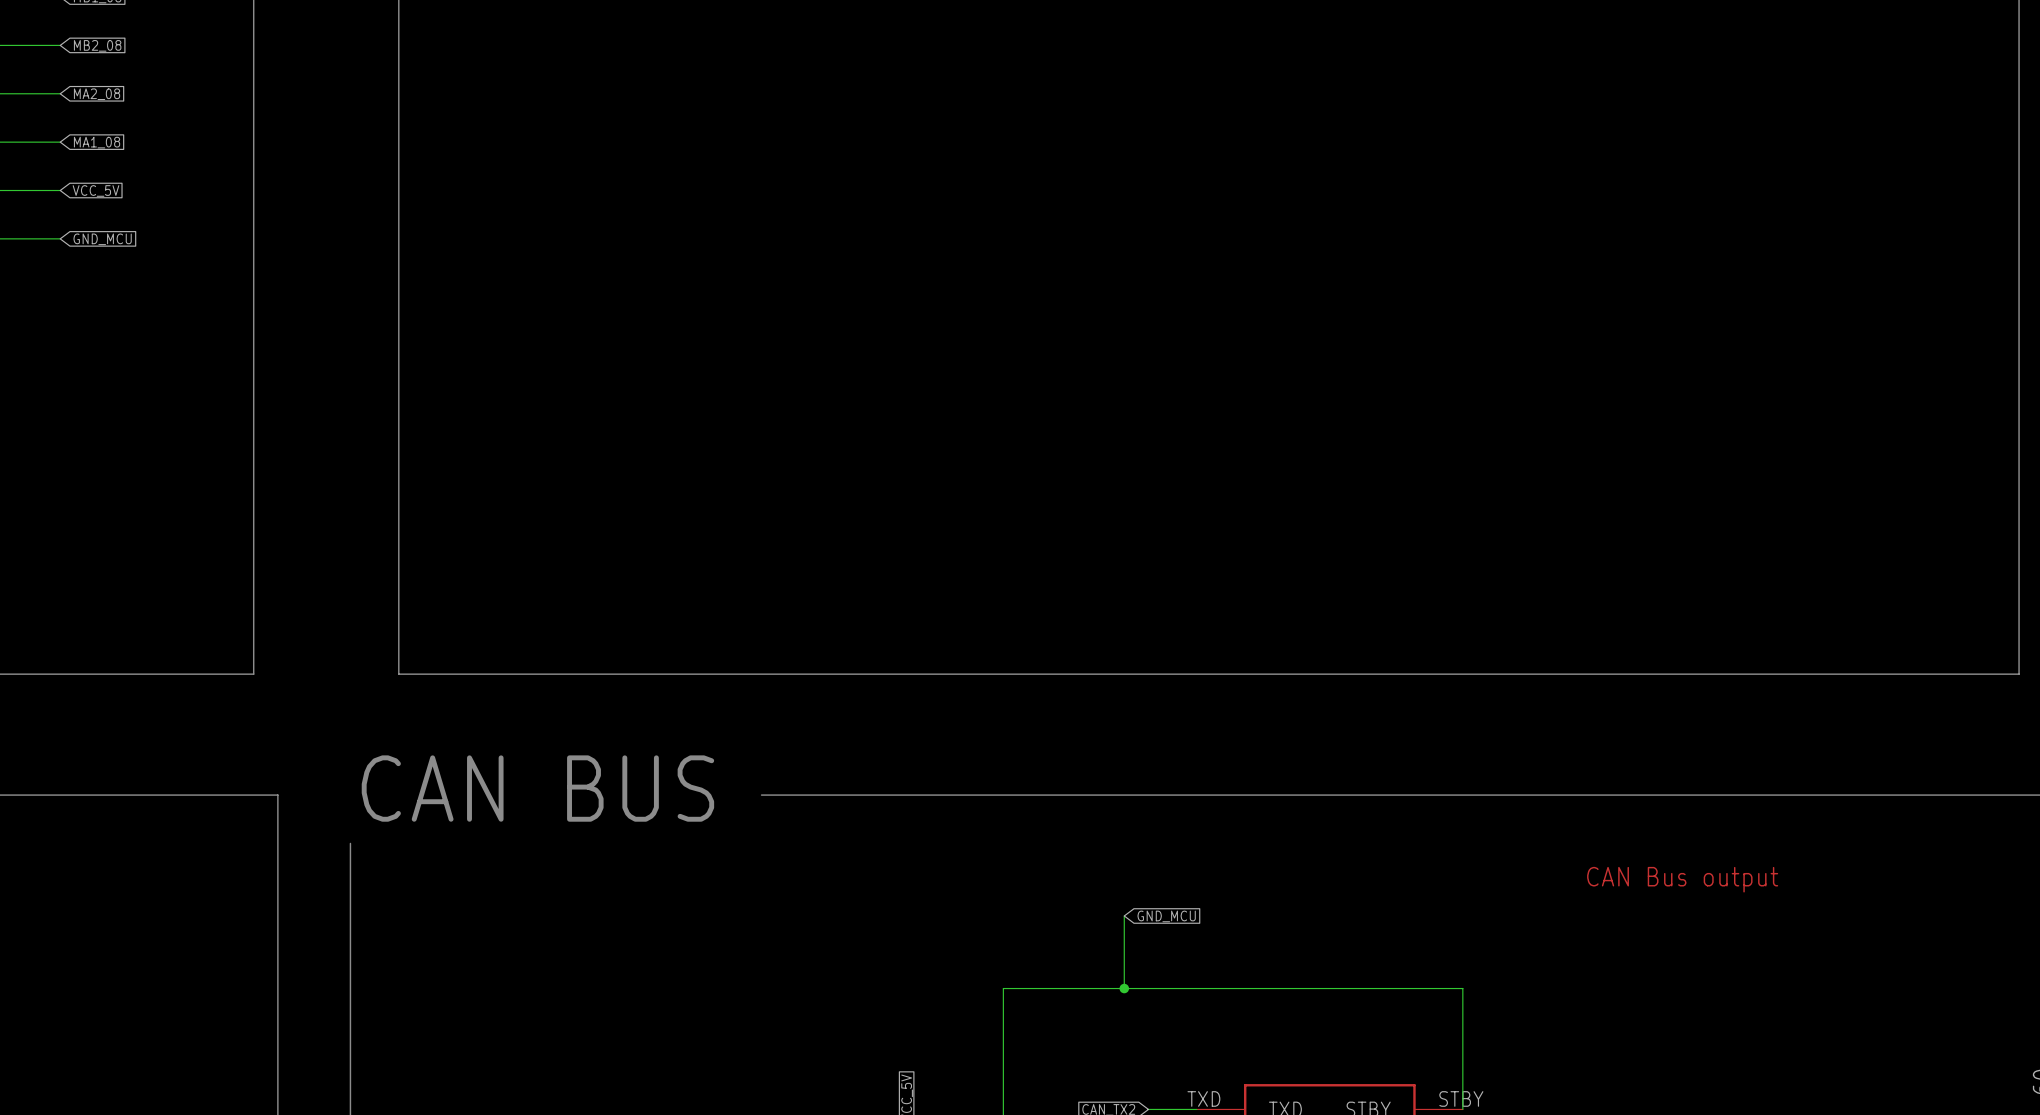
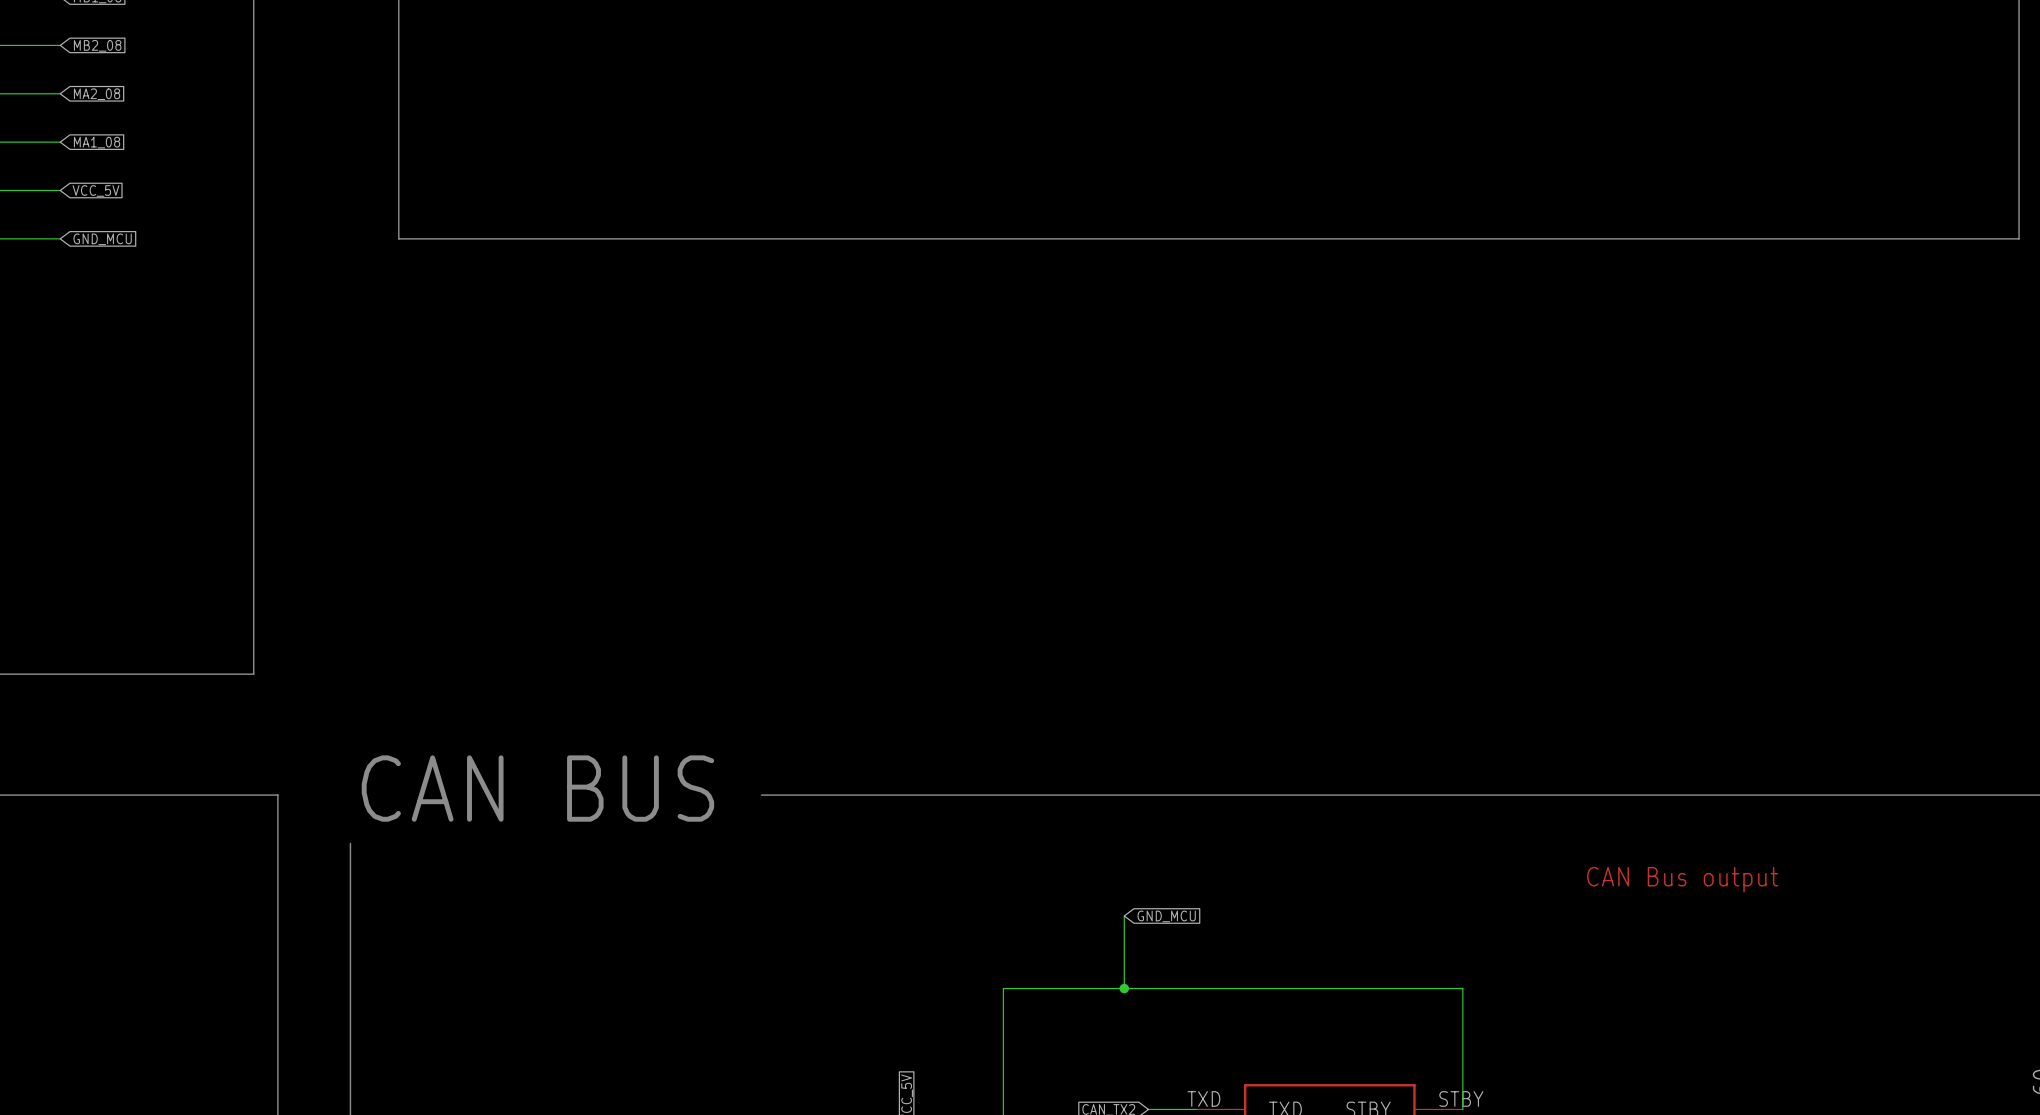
line: (398, 238) (398, 674) (2019, 674) (2019, 238) -> (398, 238) (2019, 238)

